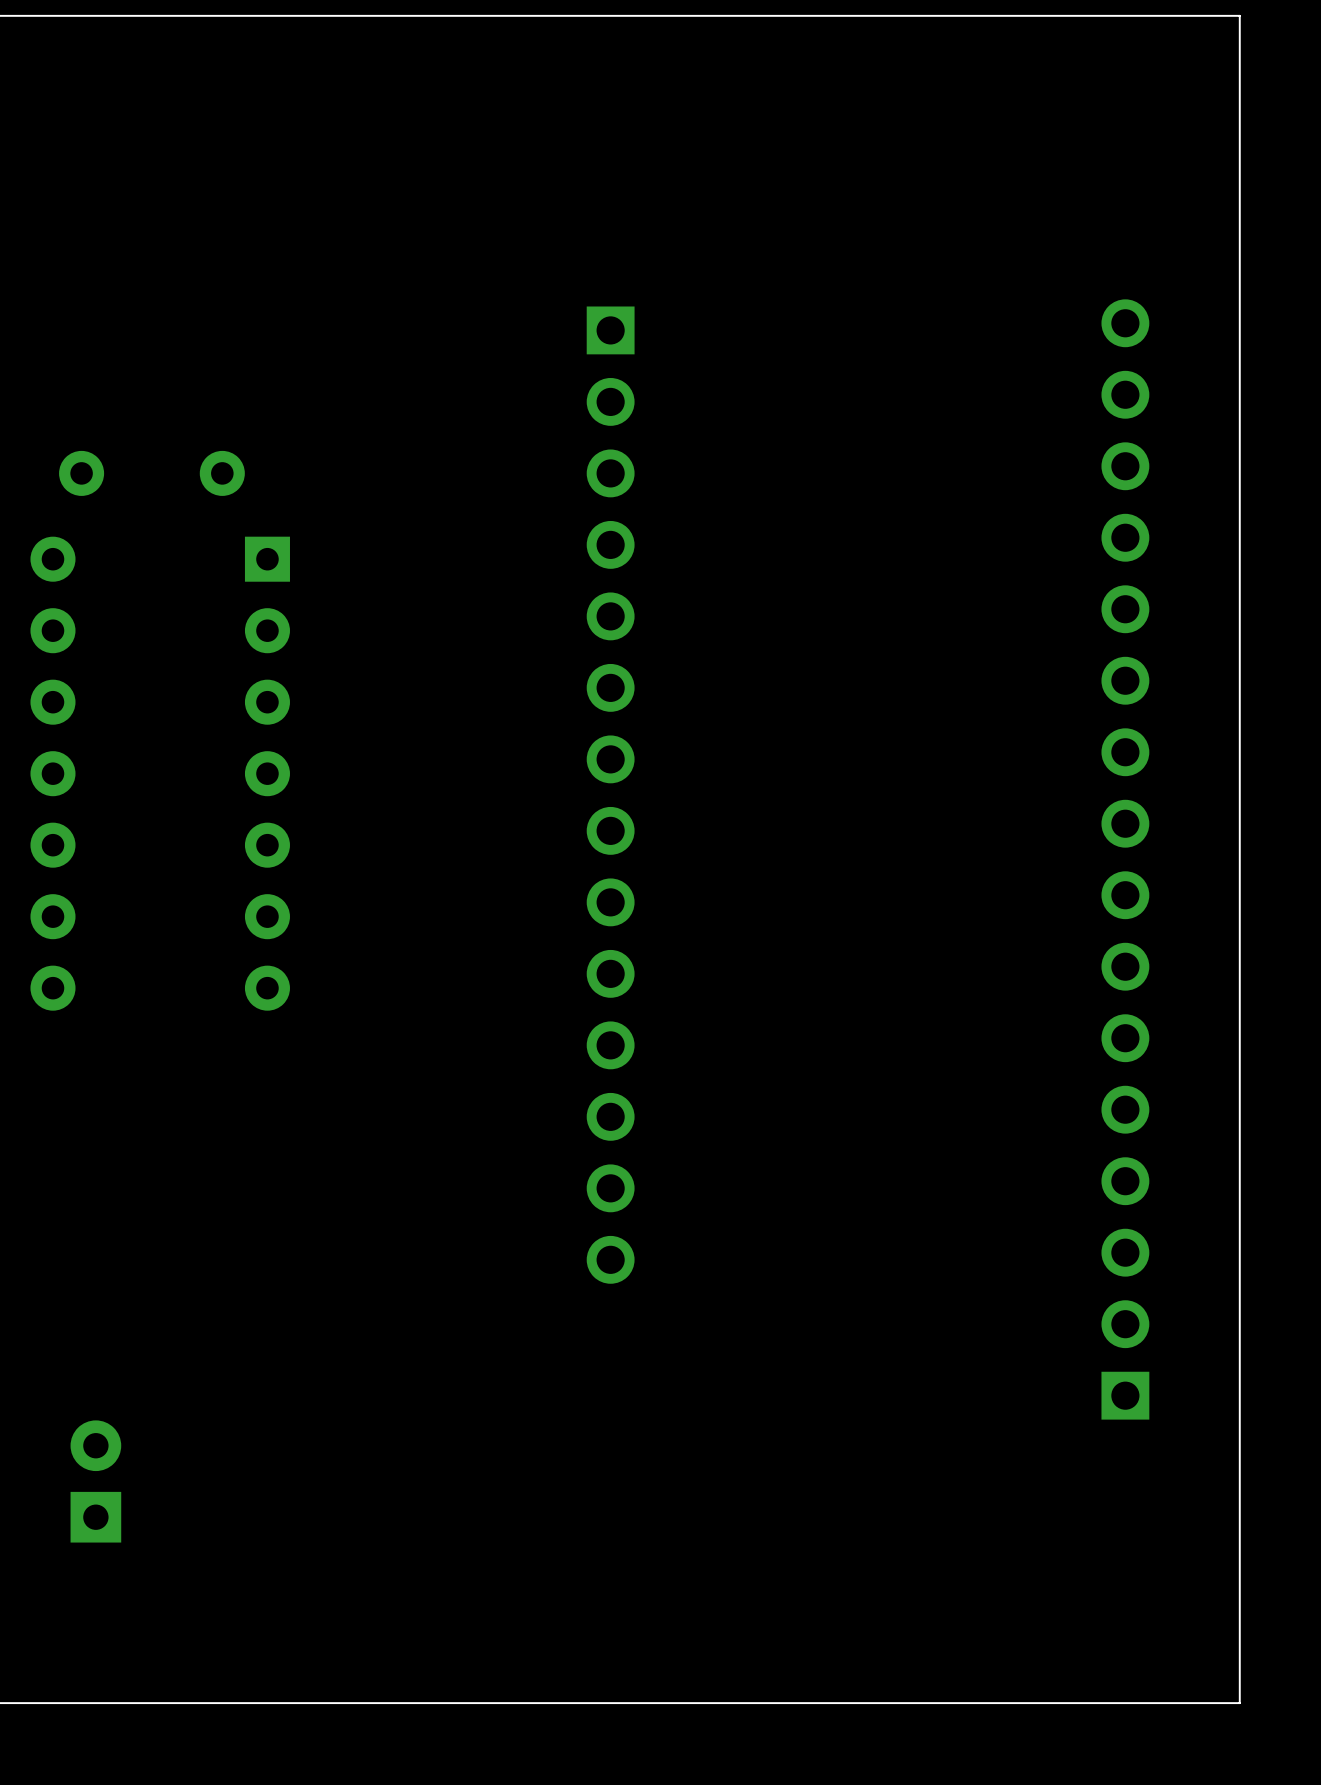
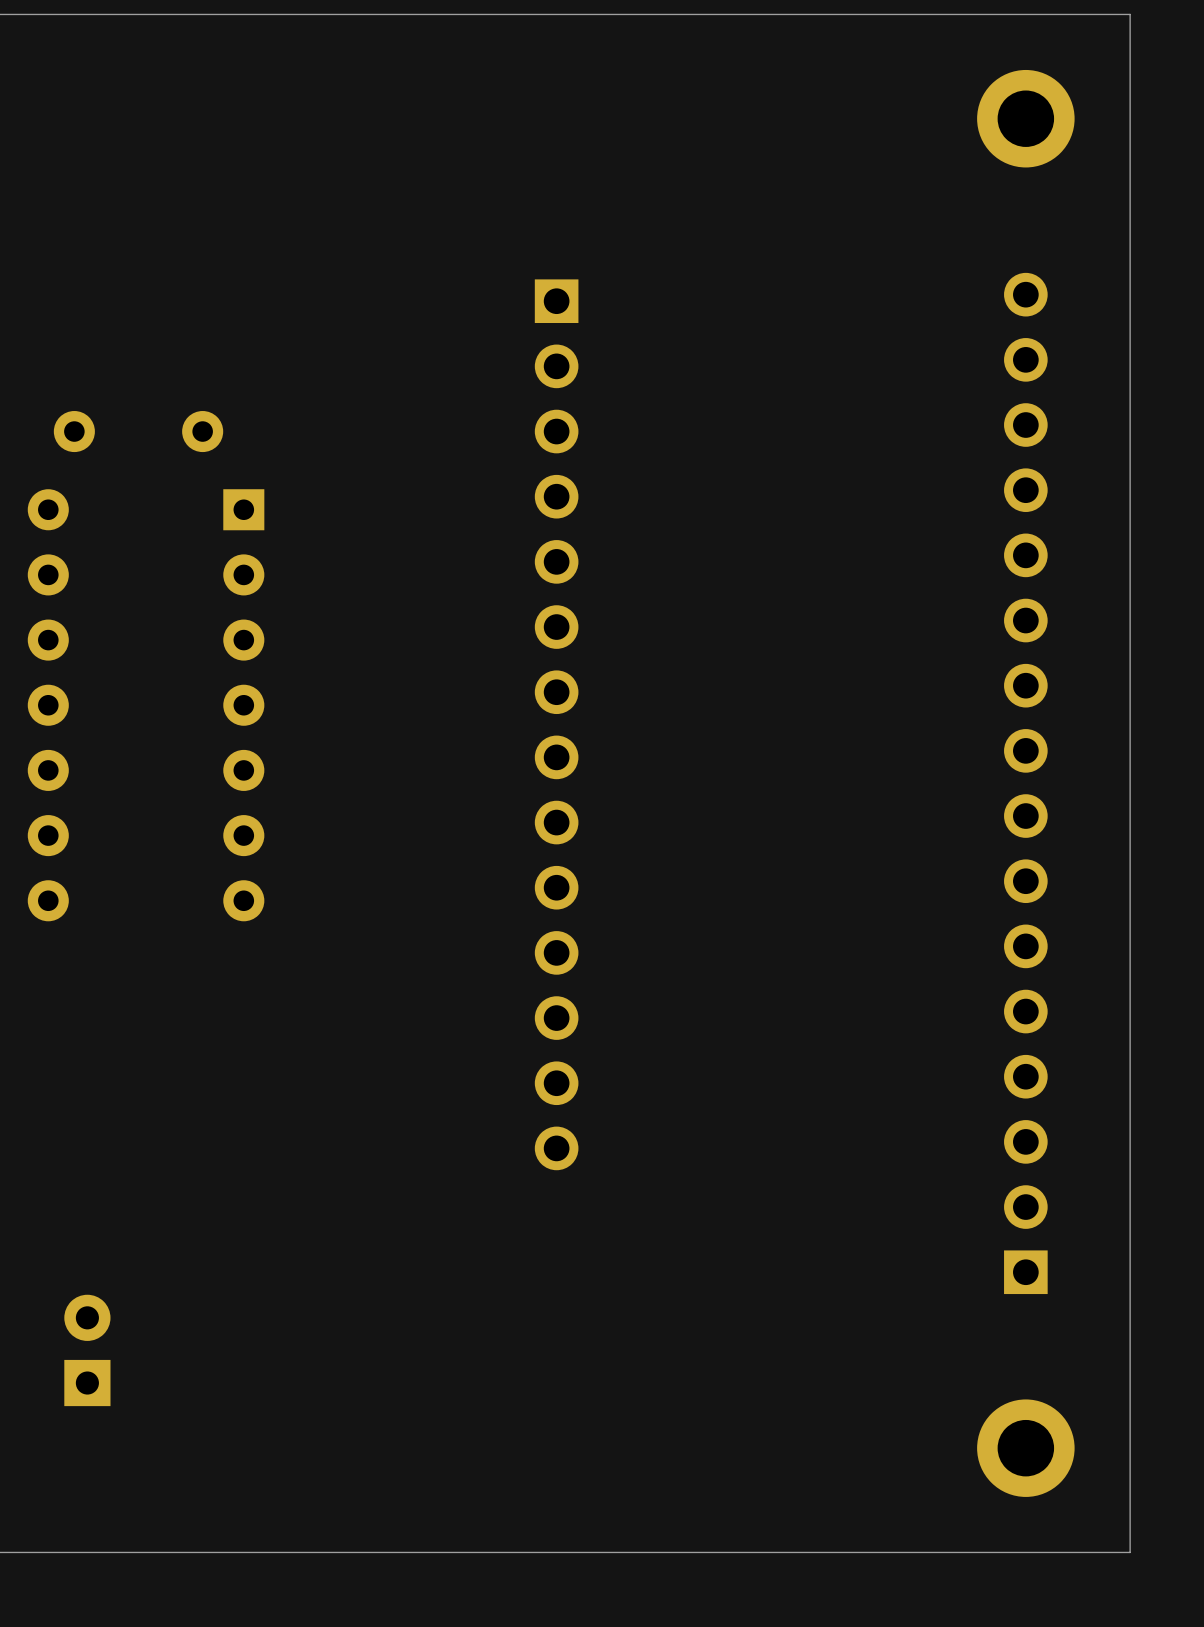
part: none -> (1025, 118)
part: none -> (1025, 1448)

